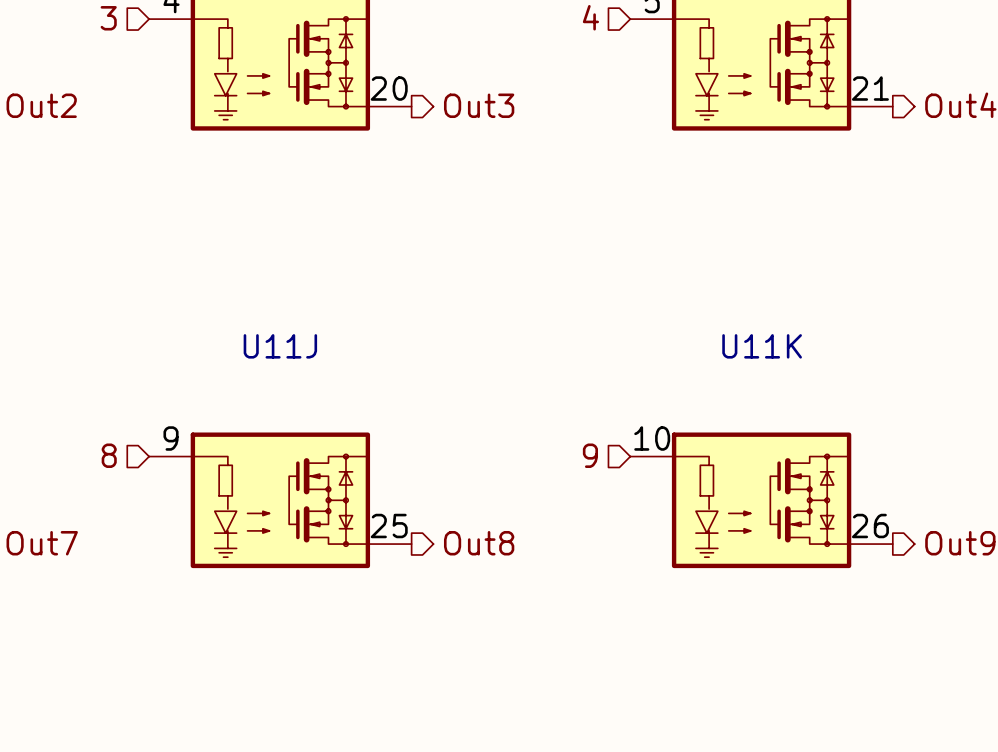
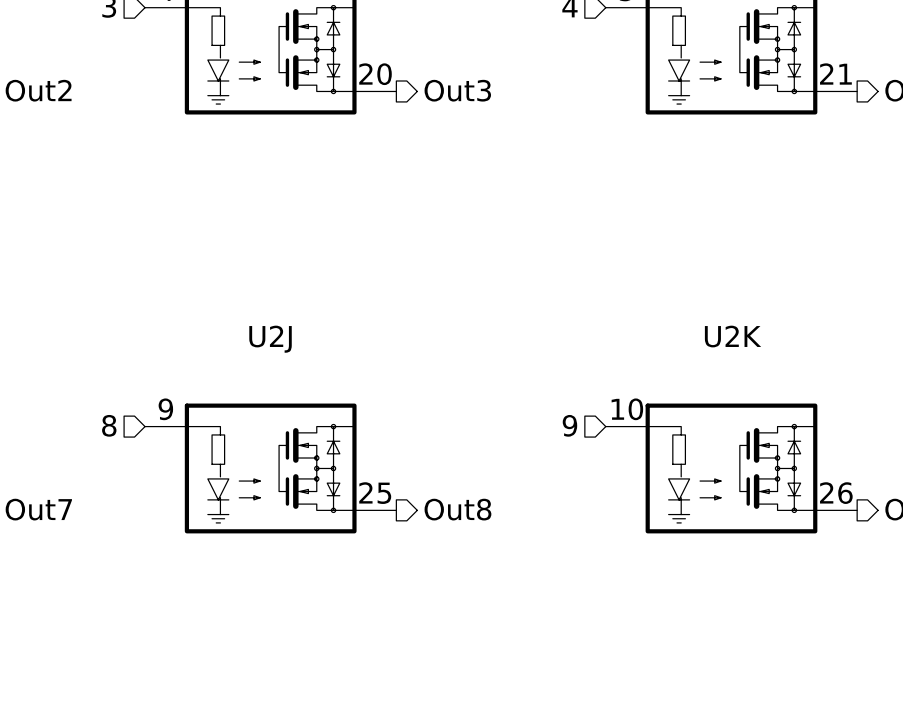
U11J name: U11J (280, 346) -> U2J (270, 339)
U11K name: U11K (762, 346) -> U2K (733, 336)

